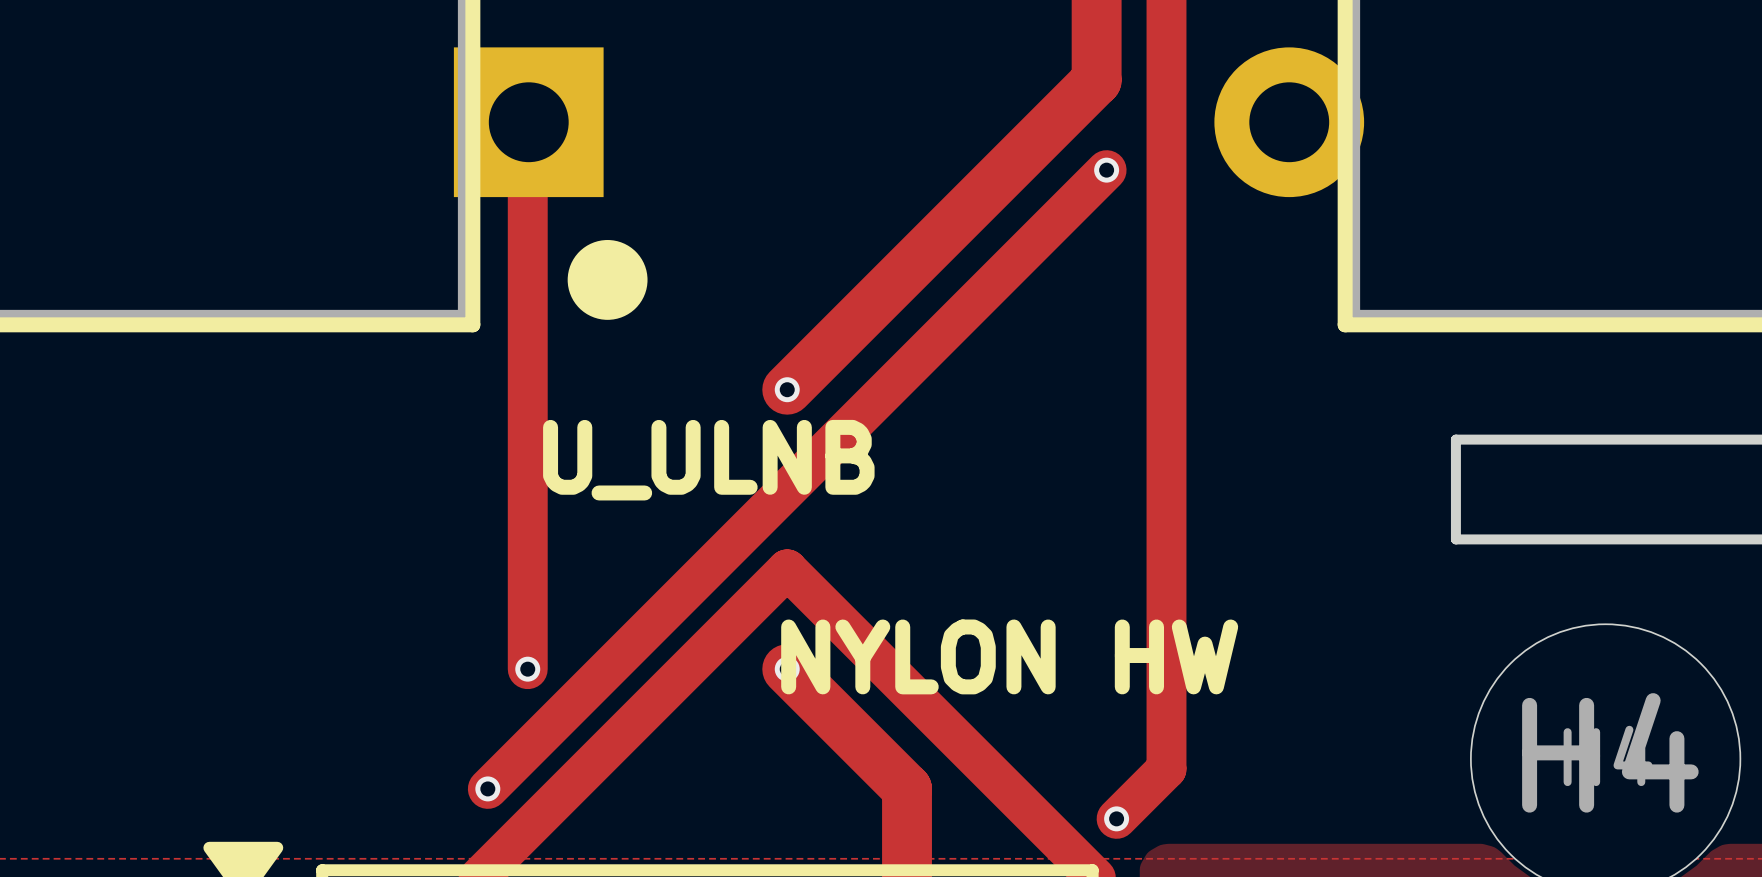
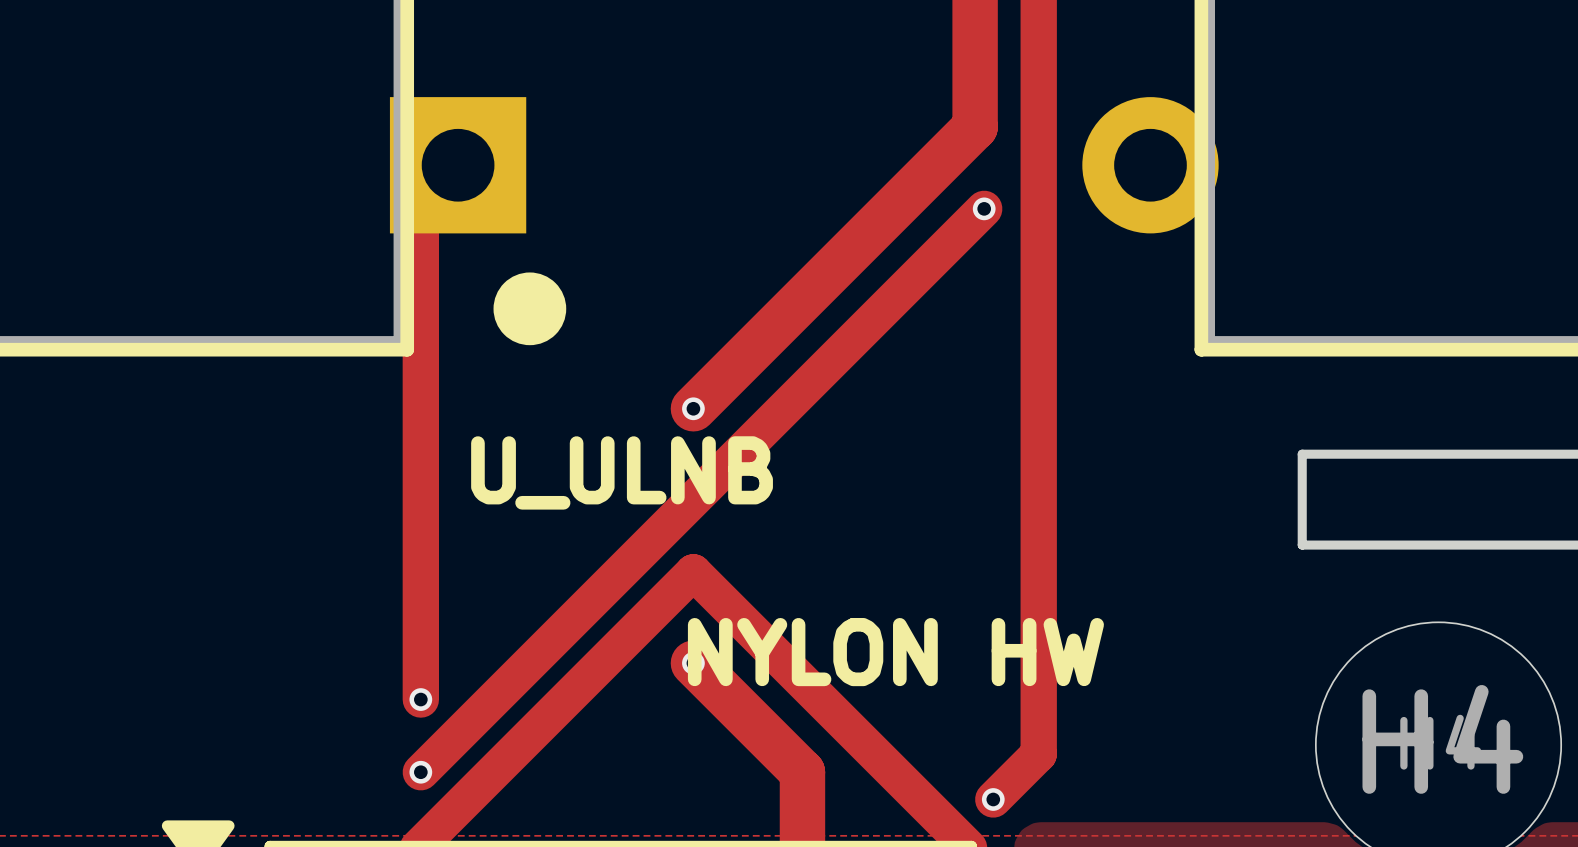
track: (527, 120) (527, 669) -> (457, 163) (420, 199) (420, 699)
via position: (527, 669) -> (420, 699)

